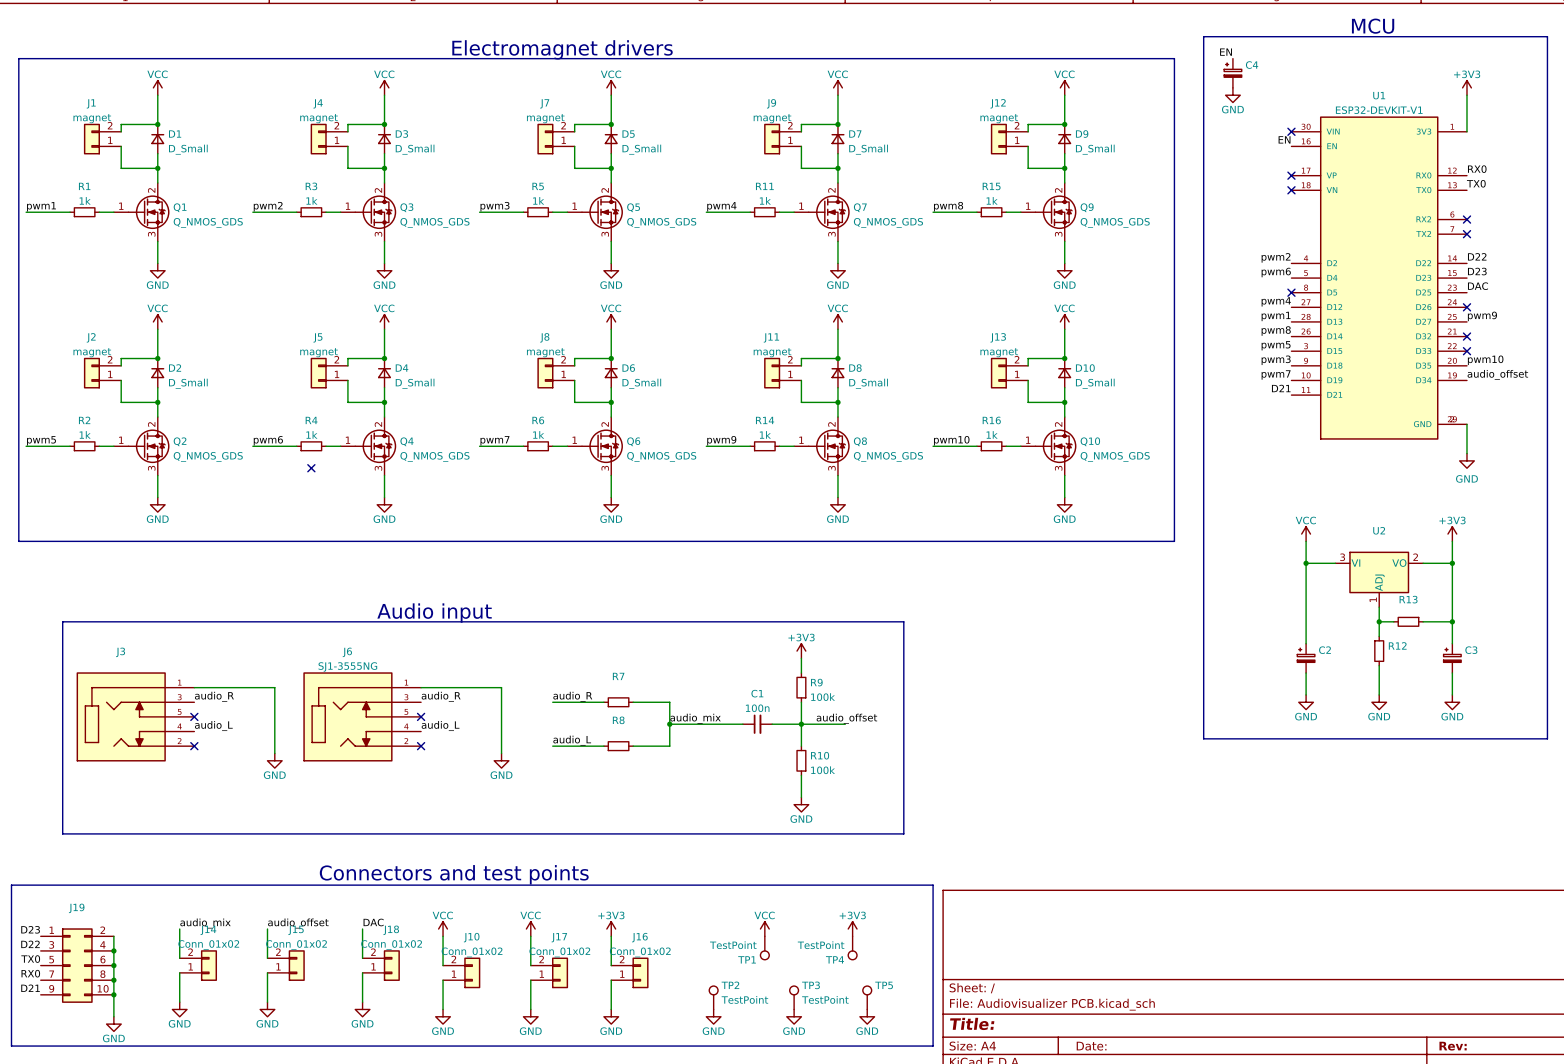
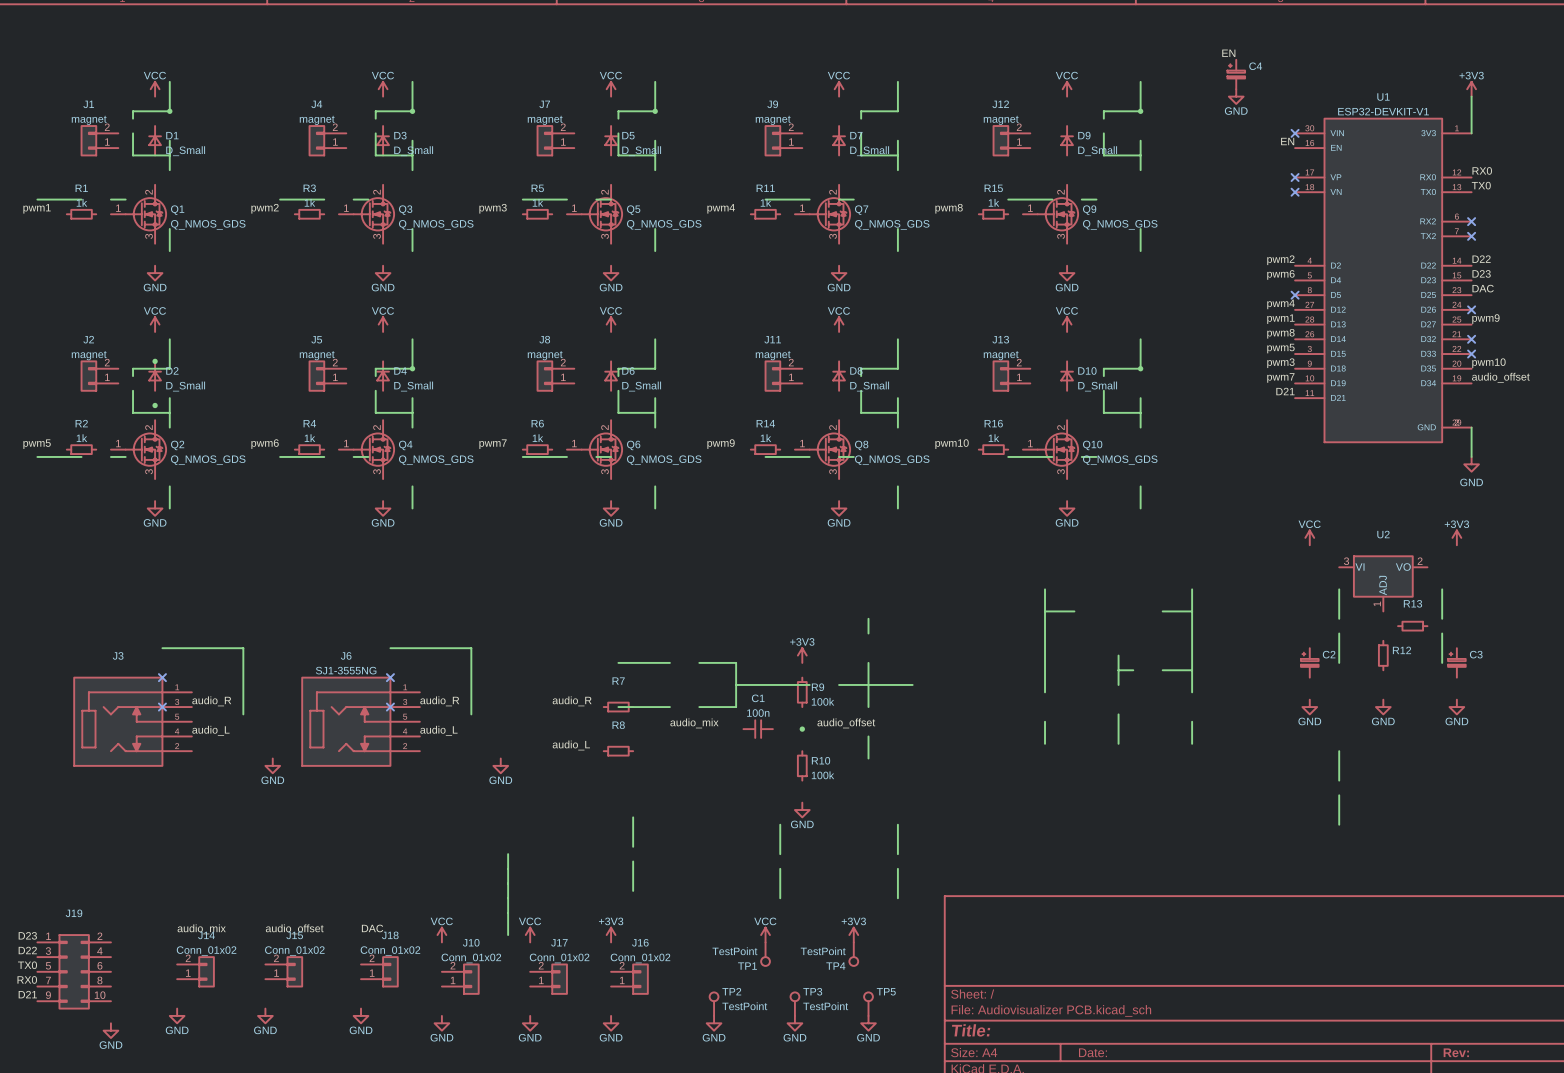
text: MCU (1373, 26) -> none
line: (1203, 36) (1203, 738) (1547, 738) (1547, 36) (1203, 36) -> none
text: Electromagnet drivers (562, 49) -> none
line: (18, 58) (18, 541) (1174, 541) (1174, 58) (18, 58) -> none
wire: (157, 95) (157, 124) (121, 124) (121, 131) -> (169, 81) (169, 111) (133, 111) (133, 118)
wire: (384, 95) (384, 124) (347, 124) (347, 131) -> (412, 81) (412, 111) (375, 111) (375, 118)
wire: (611, 95) (611, 124) (574, 124) (574, 131) -> (655, 81) (655, 111) (618, 111) (618, 118)
wire: (837, 95) (837, 124) (801, 124) (801, 131) -> (897, 81) (897, 111) (861, 111) (861, 118)
wire: (1064, 95) (1064, 124) (1028, 124) (1028, 131) -> (1140, 81) (1140, 111) (1103, 111) (1103, 118)
junction: none -> (412, 111)
junction: none -> (655, 111)
junction: none -> (1140, 111)
junction position: (157, 124) -> (169, 111)
junction: (384, 124) -> none
junction: (611, 124) -> none
junction: (837, 124) -> none
junction: (1064, 124) -> none
wire: (121, 146) (121, 168) (157, 168) -> (133, 133) (133, 155) (169, 155)
wire: (347, 146) (347, 168) (384, 168) -> (375, 133) (375, 155) (412, 155)
wire: (574, 146) (574, 168) (611, 168) -> (618, 133) (618, 155) (655, 155)
wire: (801, 146) (801, 168) (837, 168) -> (861, 133) (861, 155) (897, 155)
wire: (1028, 146) (1028, 168) (1064, 168) -> (1103, 133) (1103, 155) (1140, 155)
wire: (157, 153) (157, 182) -> (169, 140) (169, 170)
wire: (384, 153) (384, 182) -> (412, 140) (412, 170)
wire: (611, 153) (611, 182) -> (655, 140) (655, 170)
wire: (837, 153) (837, 182) -> (897, 140) (897, 170)
wire: (1064, 153) (1064, 182) -> (1140, 140) (1140, 170)
junction: (157, 168) -> none
junction: (384, 168) -> none
junction: (611, 168) -> none
junction: (837, 168) -> none
junction: (1064, 168) -> none
wire: (26, 212) (70, 212) -> (37, 199) (81, 199)
wire: (99, 212) (113, 212) -> (110, 199) (125, 199)
wire: (252, 212) (296, 212) -> (280, 199) (324, 199)
wire: (326, 212) (340, 212) -> (353, 199) (368, 199)
wire: (479, 212) (523, 212) -> (522, 199) (566, 199)
wire: (552, 212) (567, 212) -> (596, 199) (611, 199)
wire: (706, 212) (750, 212) -> (765, 199) (809, 199)
wire: (779, 212) (794, 212) -> (839, 199) (853, 199)
wire: (933, 212) (976, 212) -> (1008, 199) (1052, 199)
wire: (1006, 212) (1020, 212) -> (1081, 199) (1096, 199)
wire: (157, 241) (157, 263) -> (169, 228) (169, 251)
wire: (384, 241) (384, 263) -> (412, 228) (412, 251)
wire: (611, 241) (611, 263) -> (655, 228) (655, 251)
wire: (837, 241) (837, 263) -> (897, 228) (897, 251)
wire: (1064, 241) (1064, 263) -> (1140, 228) (1140, 251)
wire: (157, 329) (157, 358) (121, 358) (121, 365) -> (169, 339) (169, 368) (133, 368) (133, 376)
wire: (384, 329) (384, 358) (347, 358) (347, 365) -> (412, 339) (412, 368) (375, 368) (375, 376)
wire: (611, 329) (611, 358) (574, 358) (574, 365) -> (655, 339) (655, 368) (618, 368) (618, 376)
wire: (837, 329) (837, 358) (801, 358) (801, 365) -> (897, 339) (897, 368) (861, 368) (861, 376)
wire: (1064, 329) (1064, 358) (1028, 358) (1028, 365) -> (1140, 339) (1140, 368) (1103, 368) (1103, 376)
junction: (384, 358) -> none
junction: (611, 358) -> none
junction: (837, 358) -> none
junction: (1064, 358) -> none
junction: none -> (412, 368)
junction: none -> (1140, 368)
wire: (121, 380) (121, 402) (157, 402) -> (133, 390) (133, 412) (169, 412)
wire: (347, 380) (347, 402) (384, 402) -> (375, 390) (375, 412) (412, 412)
wire: (574, 380) (574, 402) (611, 402) -> (618, 390) (618, 412) (655, 412)
wire: (801, 380) (801, 402) (837, 402) -> (861, 390) (861, 412) (897, 412)
wire: (1028, 380) (1028, 402) (1064, 402) -> (1103, 390) (1103, 412) (1140, 412)
wire: (157, 387) (157, 417) -> (169, 398) (169, 427)
wire: (384, 387) (384, 417) -> (412, 398) (412, 427)
wire: (611, 387) (611, 417) -> (655, 398) (655, 427)
wire: (837, 387) (837, 417) -> (897, 398) (897, 427)
wire: (1064, 387) (1064, 417) -> (1140, 398) (1140, 427)
junction: (384, 402) -> none
junction: (611, 402) -> none
junction: (837, 402) -> none
junction: (1064, 402) -> none
wire: (26, 446) (70, 446) -> (37, 456) (81, 456)
wire: (99, 446) (113, 446) -> (110, 456) (125, 456)
wire: (252, 446) (296, 446) -> (280, 456) (324, 456)
wire: (326, 446) (340, 446) -> (353, 456) (368, 456)
wire: (479, 446) (523, 446) -> (522, 456) (566, 456)
wire: (552, 446) (567, 446) -> (596, 456) (611, 456)
wire: (706, 446) (750, 446) -> (765, 456) (809, 456)
wire: (779, 446) (794, 446) -> (839, 456) (853, 456)
wire: (933, 446) (976, 446) -> (1008, 456) (1052, 456)
wire: (1006, 446) (1020, 446) -> (1081, 456) (1096, 456)
no-connect mark: (311, 468) -> none
wire: (157, 475) (157, 497) -> (169, 486) (169, 508)
wire: (384, 475) (384, 497) -> (412, 486) (412, 508)
wire: (611, 475) (611, 497) -> (655, 486) (655, 508)
wire: (837, 475) (837, 497) -> (897, 486) (897, 508)
wire: (1064, 475) (1064, 497) -> (1140, 486) (1140, 508)
wire: (1306, 541) (1306, 643) -> (1192, 589) (1192, 692)
wire: (1452, 541) (1452, 643) -> none
wire: (1306, 563) (1335, 563) -> none
junction: (1306, 563) -> none
wire: (1423, 563) (1452, 563) -> none
junction: (1452, 563) -> none
wire: none -> (1045, 589) (1045, 692)
wire: none -> (1442, 589) (1442, 618)
wire: none -> (1045, 611) (1074, 611)
wire: none -> (1162, 611) (1192, 611)
wire: (1379, 607) (1379, 636) -> (1339, 589) (1339, 618)
text: Audio input (434, 613) -> none
line: (62, 621) (62, 833) (903, 833) (903, 621) (62, 621) -> none
wire: (1379, 621) (1393, 621) -> none
junction: (1379, 621) -> none
wire: (1423, 621) (1452, 621) -> none
junction: (1452, 621) -> none
wire: none -> (1442, 633) (1442, 662)
wire: none -> (1118, 655) (1118, 684)
wire: none -> (699, 662) (736, 662) (736, 707) (699, 707)
wire: (801, 658) (801, 673) -> (868, 618) (868, 633)
wire: none -> (1118, 670) (1133, 670)
wire: none -> (1162, 670) (1192, 670)
wire: (1379, 665) (1379, 694) -> (1339, 633) (1339, 662)
no-connect mark: none -> (162, 677)
no-connect mark: none -> (390, 677)
wire: (1306, 673) (1306, 694) -> (1192, 721) (1192, 743)
wire: (1452, 673) (1452, 694) -> none
wire: (194, 687) (274, 687) (274, 753) -> (162, 648) (243, 648) (243, 714)
wire: (421, 687) (501, 687) (501, 753) -> (390, 648) (471, 648) (471, 714)
no-connect mark: none -> (162, 707)
no-connect mark: none -> (390, 707)
wire: (552, 702) (603, 702) -> (618, 662) (669, 662)
wire: none -> (618, 707) (633, 707)
wire: (669, 702) (669, 746) (633, 746) -> none
wire: (801, 702) (801, 746) -> (868, 662) (868, 707)
wire: none -> (1118, 714) (1118, 743)
no-connect mark: (194, 716) -> none
no-connect mark: (421, 716) -> none
wire: none -> (1045, 721) (1045, 743)
wire: (669, 724) (742, 724) -> (736, 684) (809, 684)
junction: (669, 724) -> none
wire: (772, 724) (845, 724) -> (839, 684) (912, 684)
no-connect mark: (194, 746) -> none
no-connect mark: (421, 746) -> none
wire: (552, 746) (603, 746) -> none
wire: none -> (1339, 751) (1339, 780)
wire: (801, 775) (801, 797) -> (868, 736) (868, 758)
wire: none -> (1339, 795) (1339, 824)
wire: none -> (780, 824) (780, 854)
wire: none -> (897, 824) (897, 854)
wire: none -> (508, 854) (508, 935)
wire: none -> (780, 868) (780, 898)
wire: none -> (897, 868) (897, 898)
text: Connectors and test points (454, 874) -> none
line: (11, 885) (11, 1046) (933, 1046) (933, 885) (11, 885) -> none
wire: (179, 929) (179, 958) -> none
wire: (267, 929) (267, 958) -> none
wire: (362, 929) (362, 958) -> none
wire: (113, 936) (113, 1016) -> none
wire: (443, 936) (443, 965) -> none
wire: (530, 936) (530, 965) -> none
wire: (611, 936) (611, 965) -> (633, 817) (633, 846)
junction: (113, 950) -> none
junction: (113, 965) -> none
wire: (179, 972) (179, 1002) -> none
wire: (267, 972) (267, 1002) -> none
wire: (362, 972) (362, 1002) -> none
junction: (113, 980) -> none
wire: (443, 980) (443, 1009) -> none
wire: (530, 980) (530, 1009) -> none
wire: (611, 980) (611, 1009) -> (633, 861) (633, 890)
junction: (113, 994) -> none

